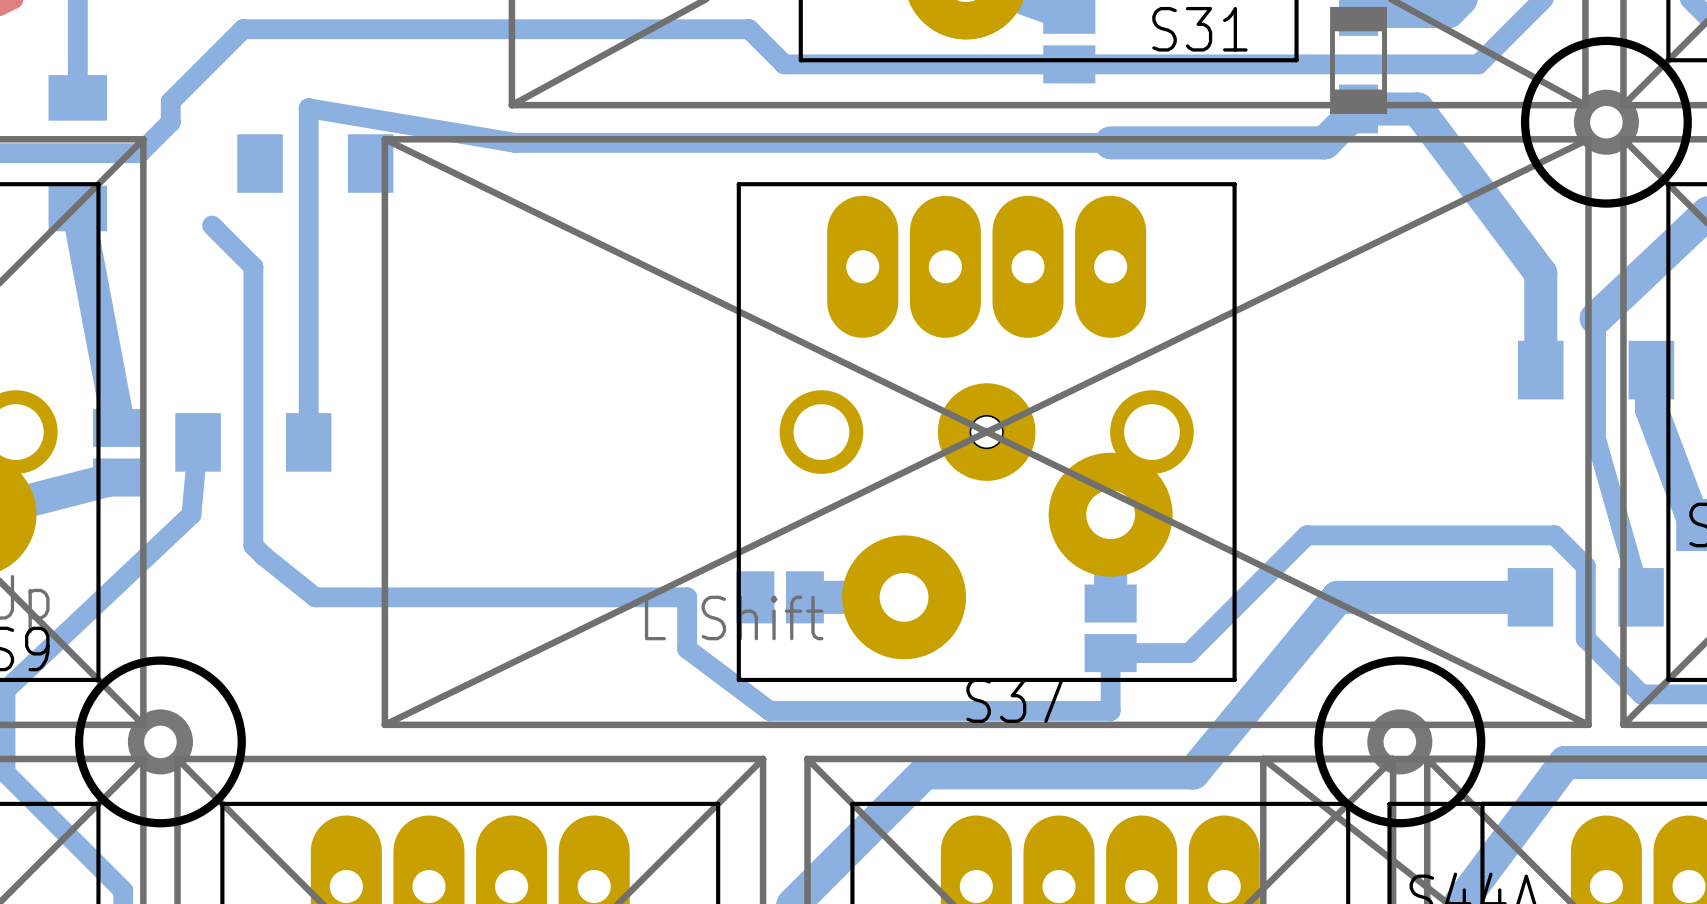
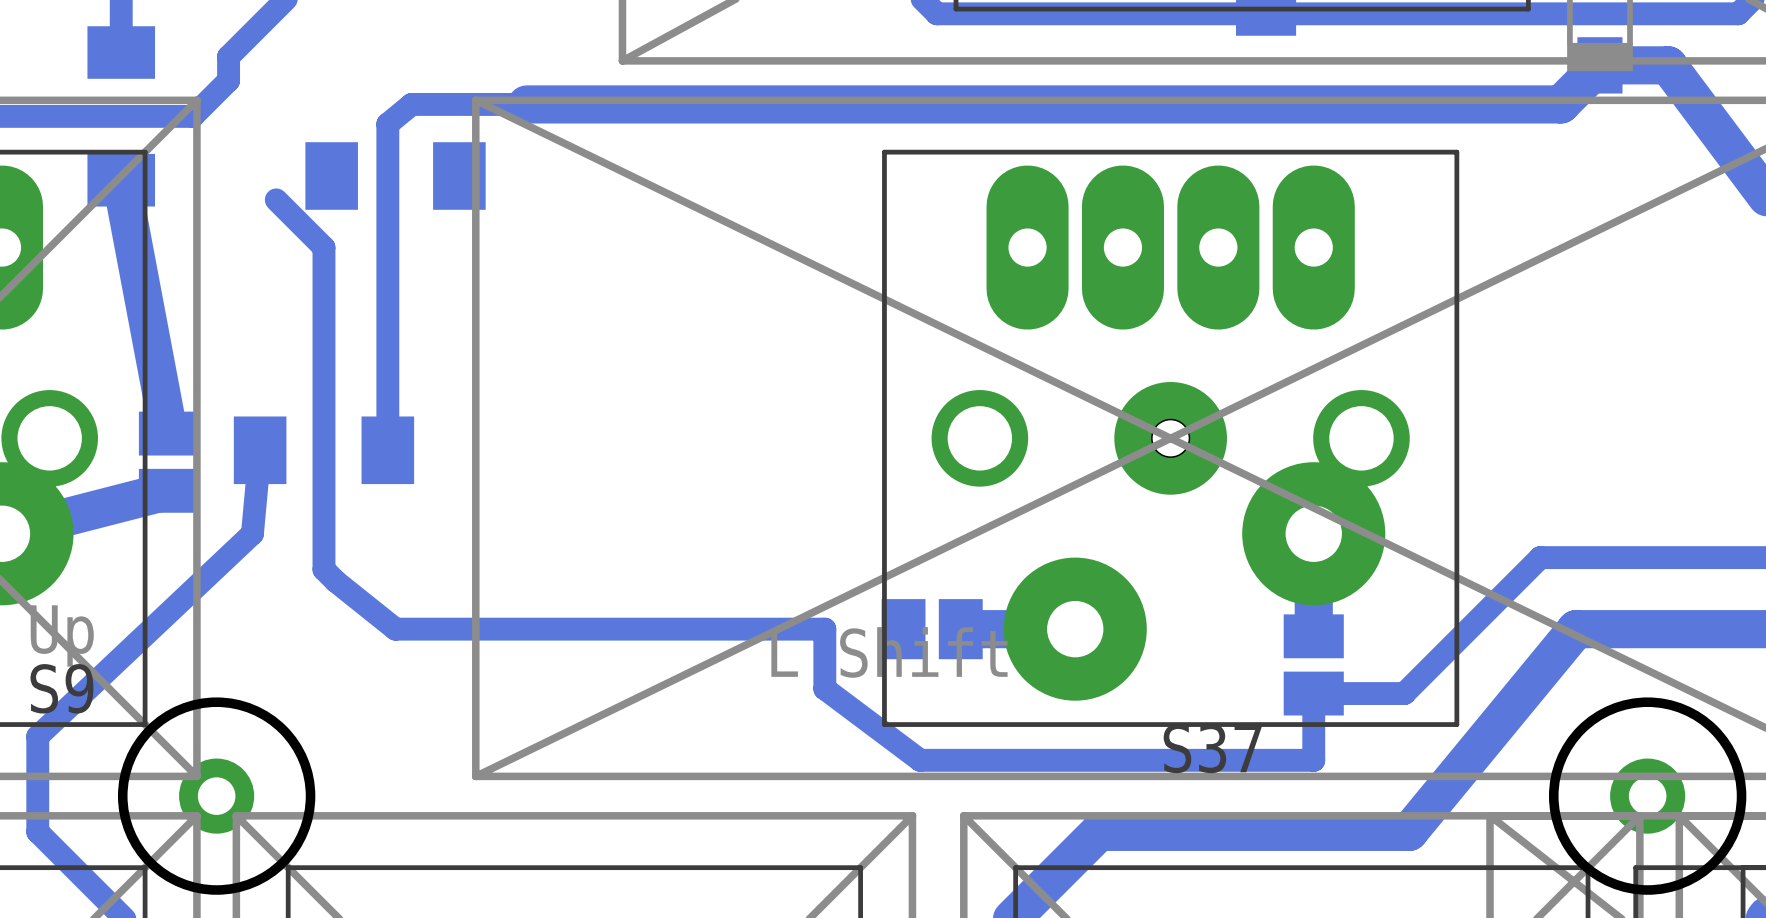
bottom track: (515, 142) (308, 108) (308, 159) -> (626, 104) (411, 104) (387, 124)
bottom track width: thin (515, 142) (1110, 142) -> thick (626, 104) (1313, 104)
part position: (315, 163) -> (395, 176)

